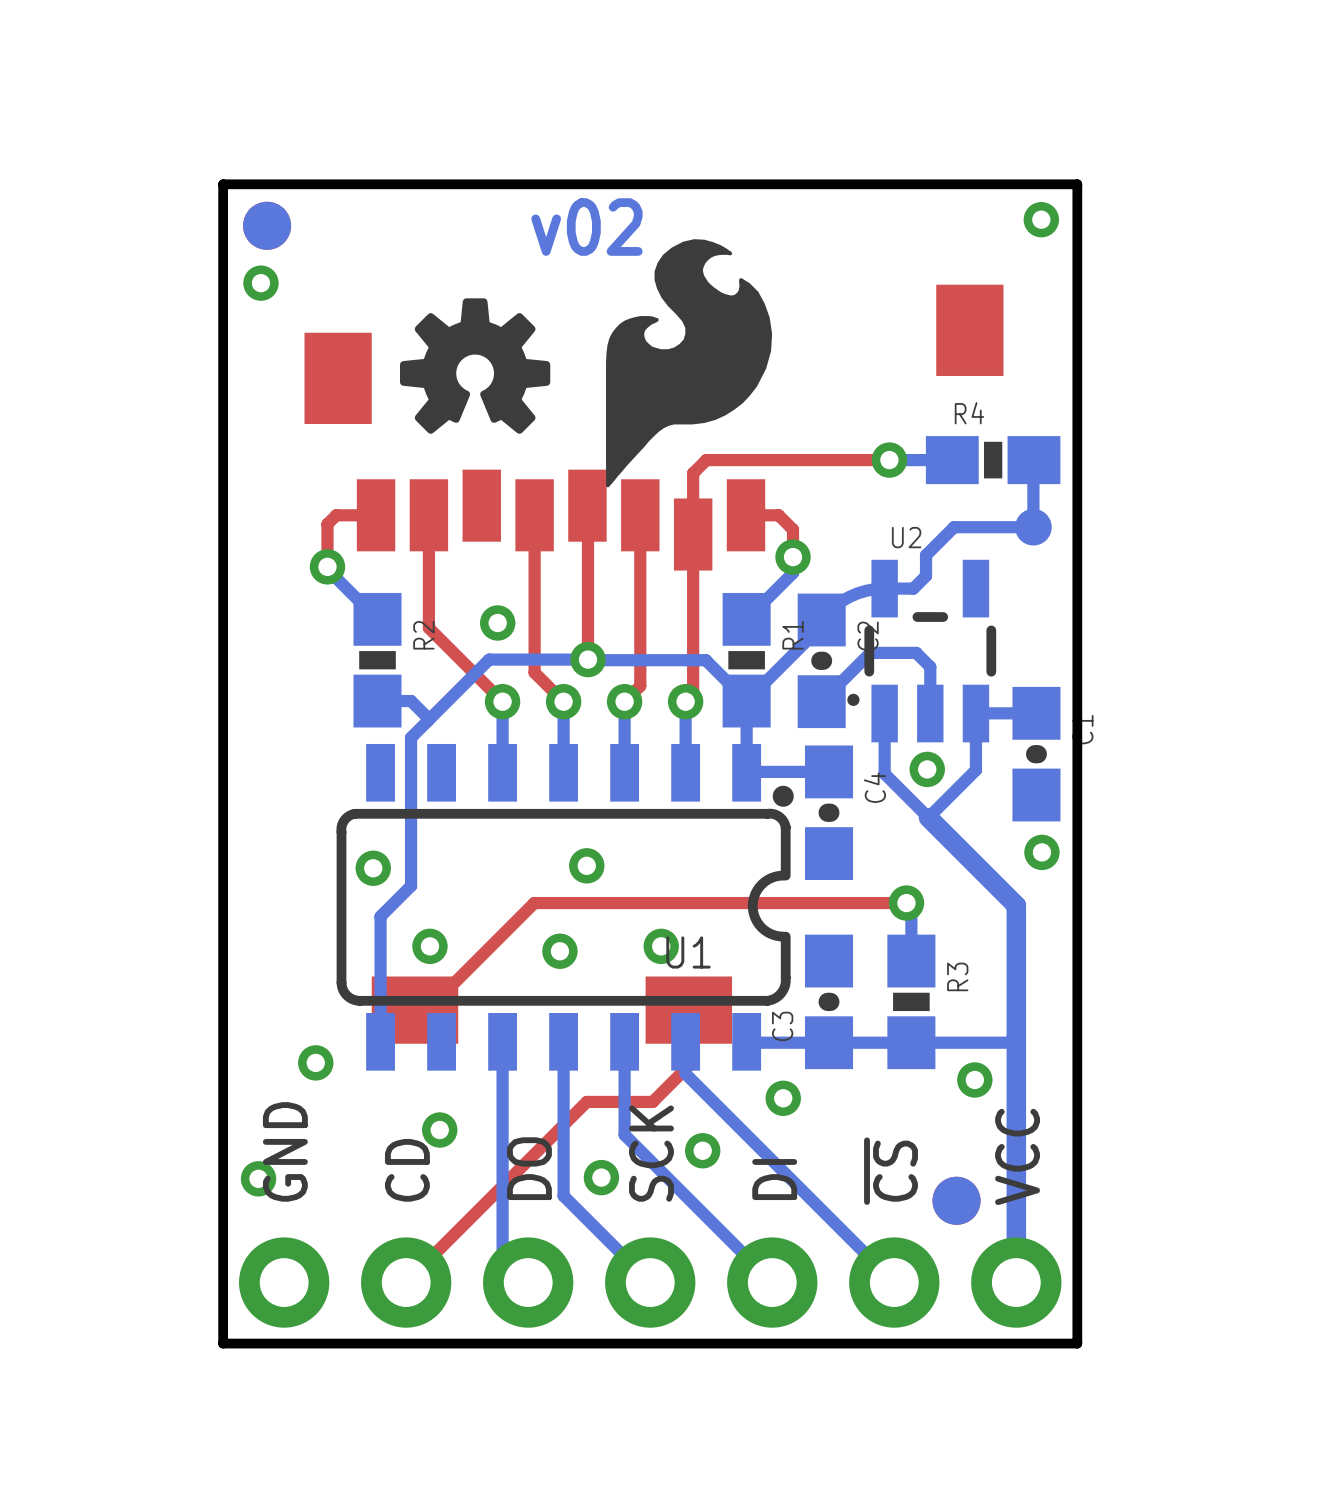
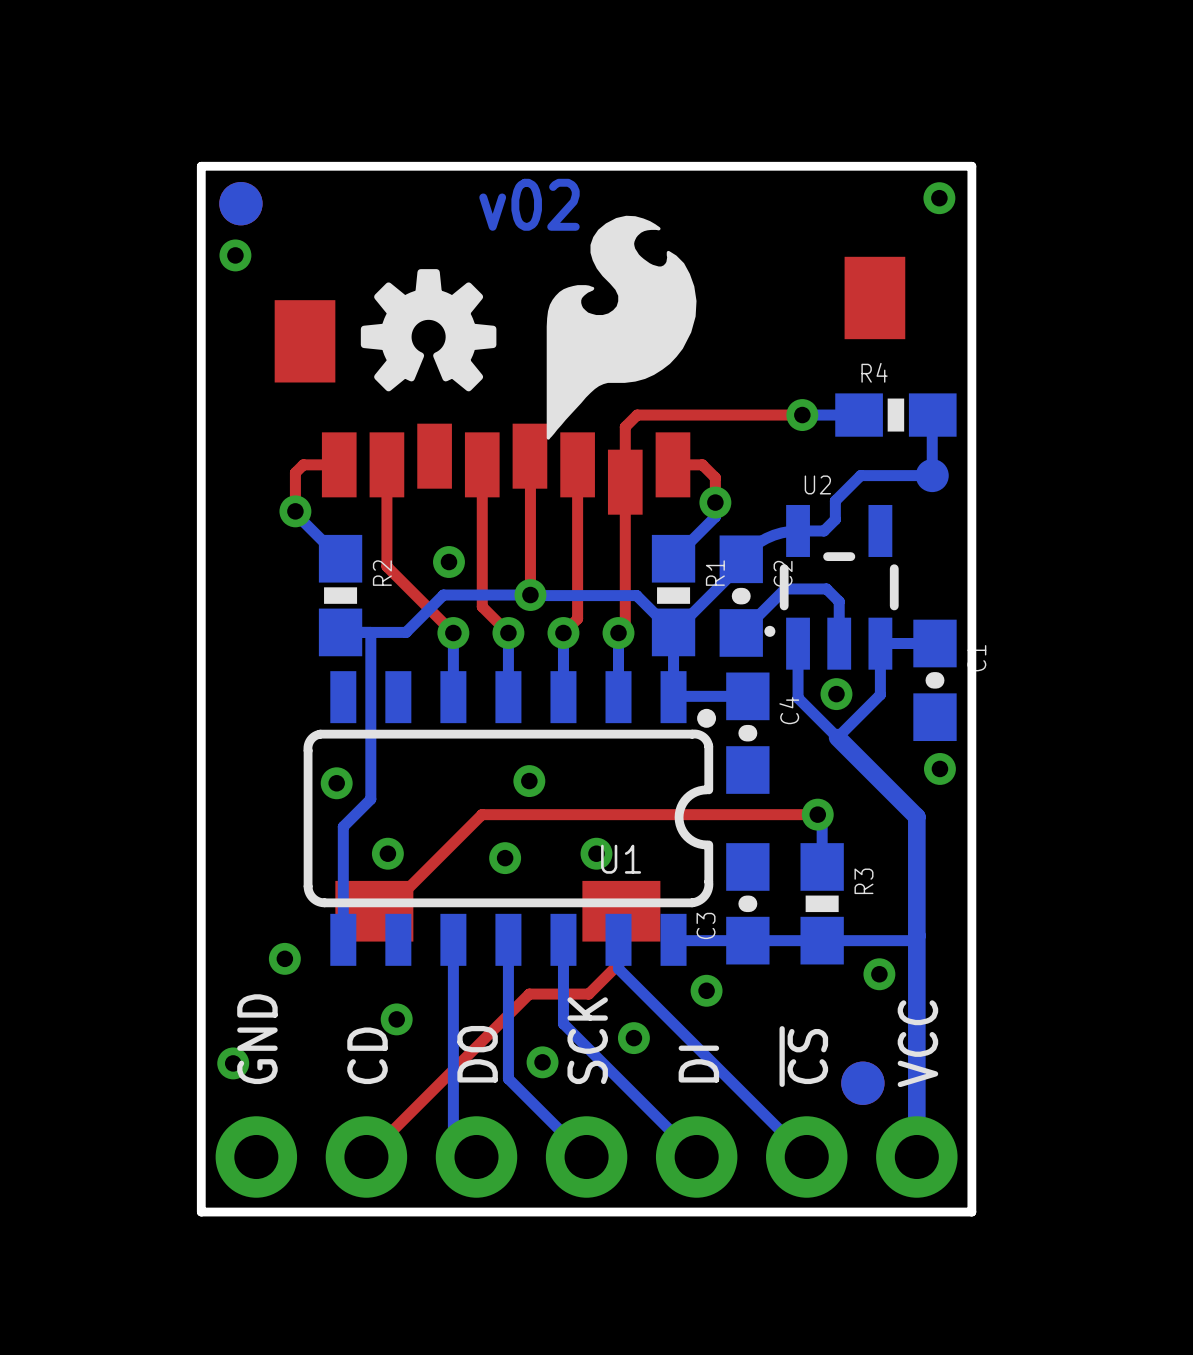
bottom track: (491, 659) (489, 659) (411, 737) -> (443, 595) (406, 632) (370, 632) (370, 665)
bottom track: (411, 701) (427, 717) (427, 720) -> none

